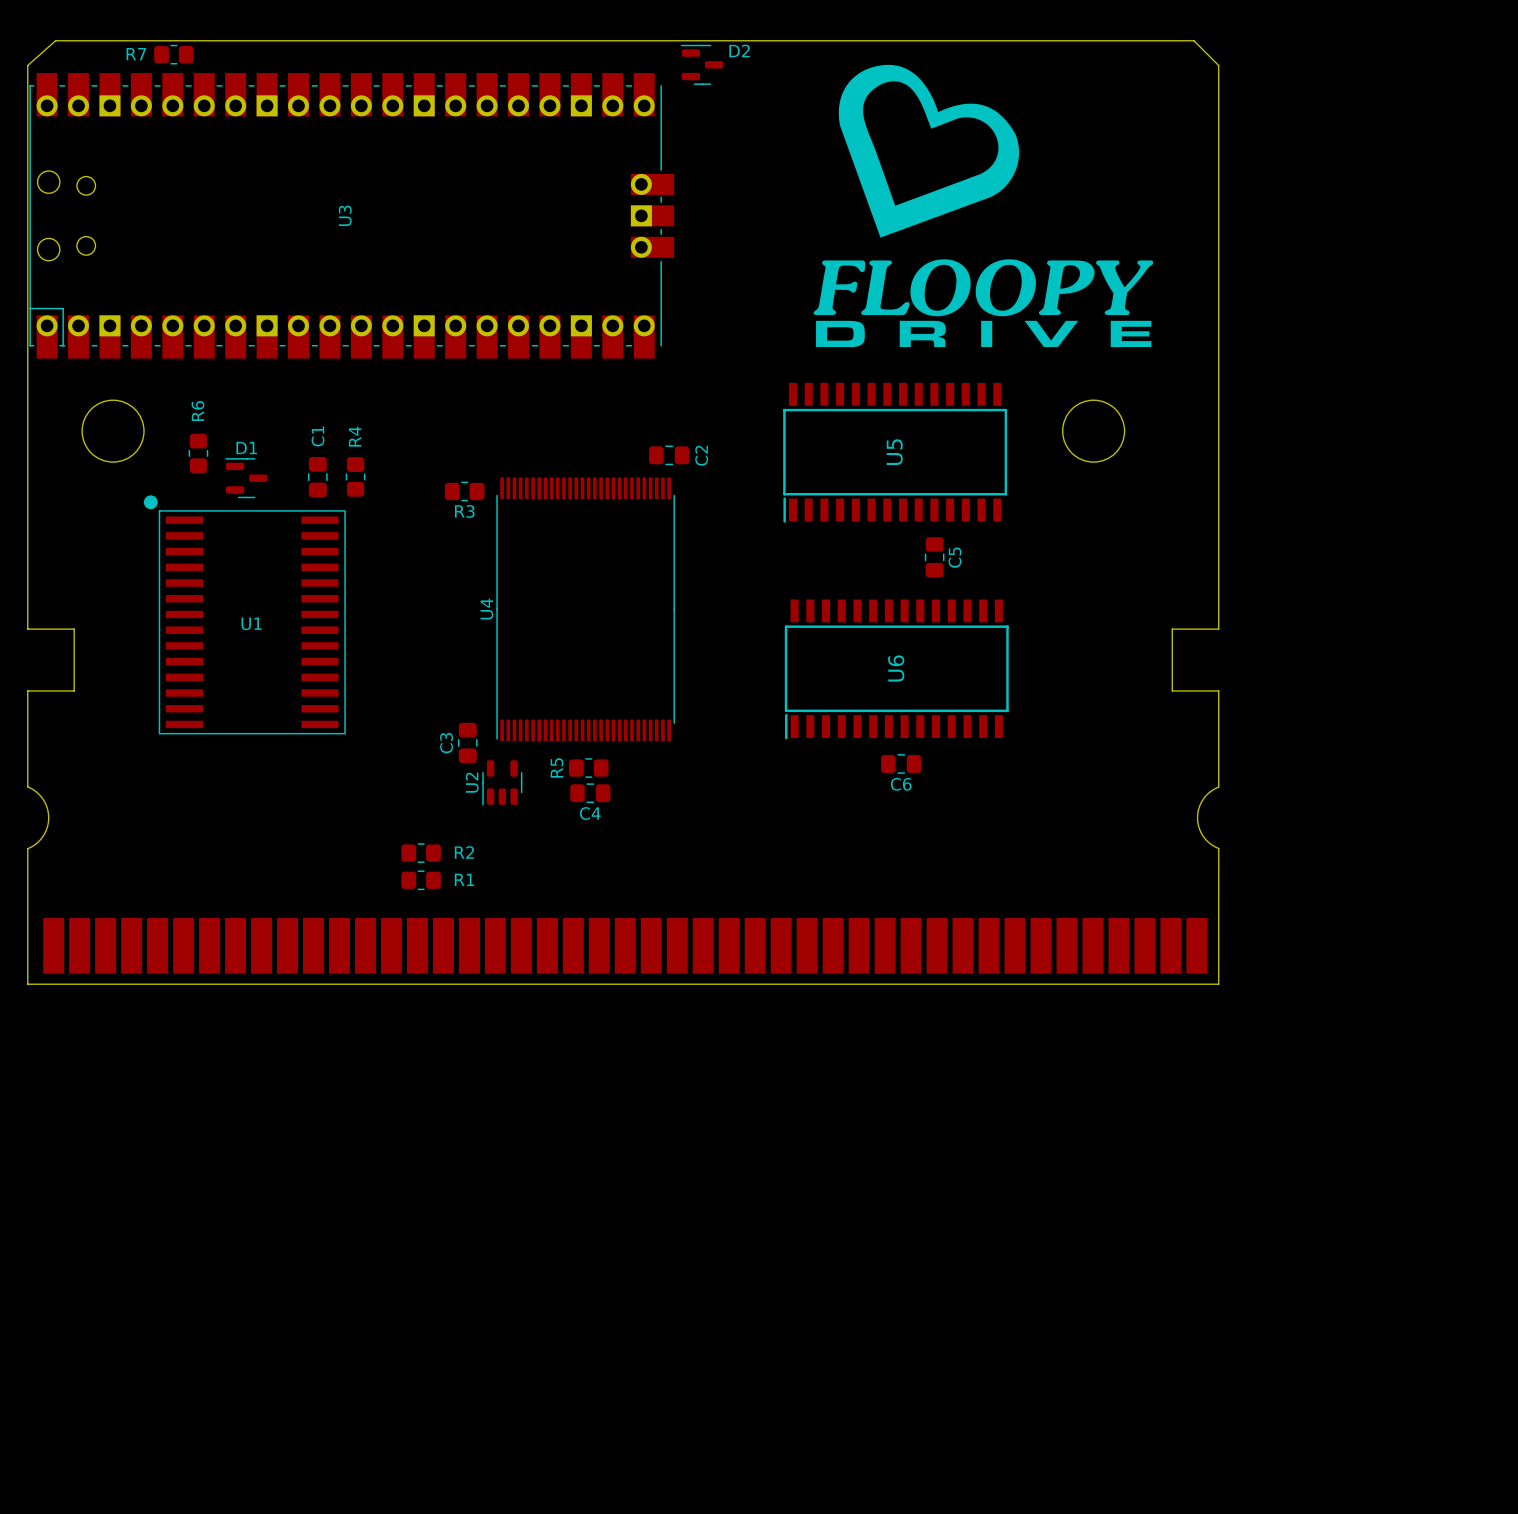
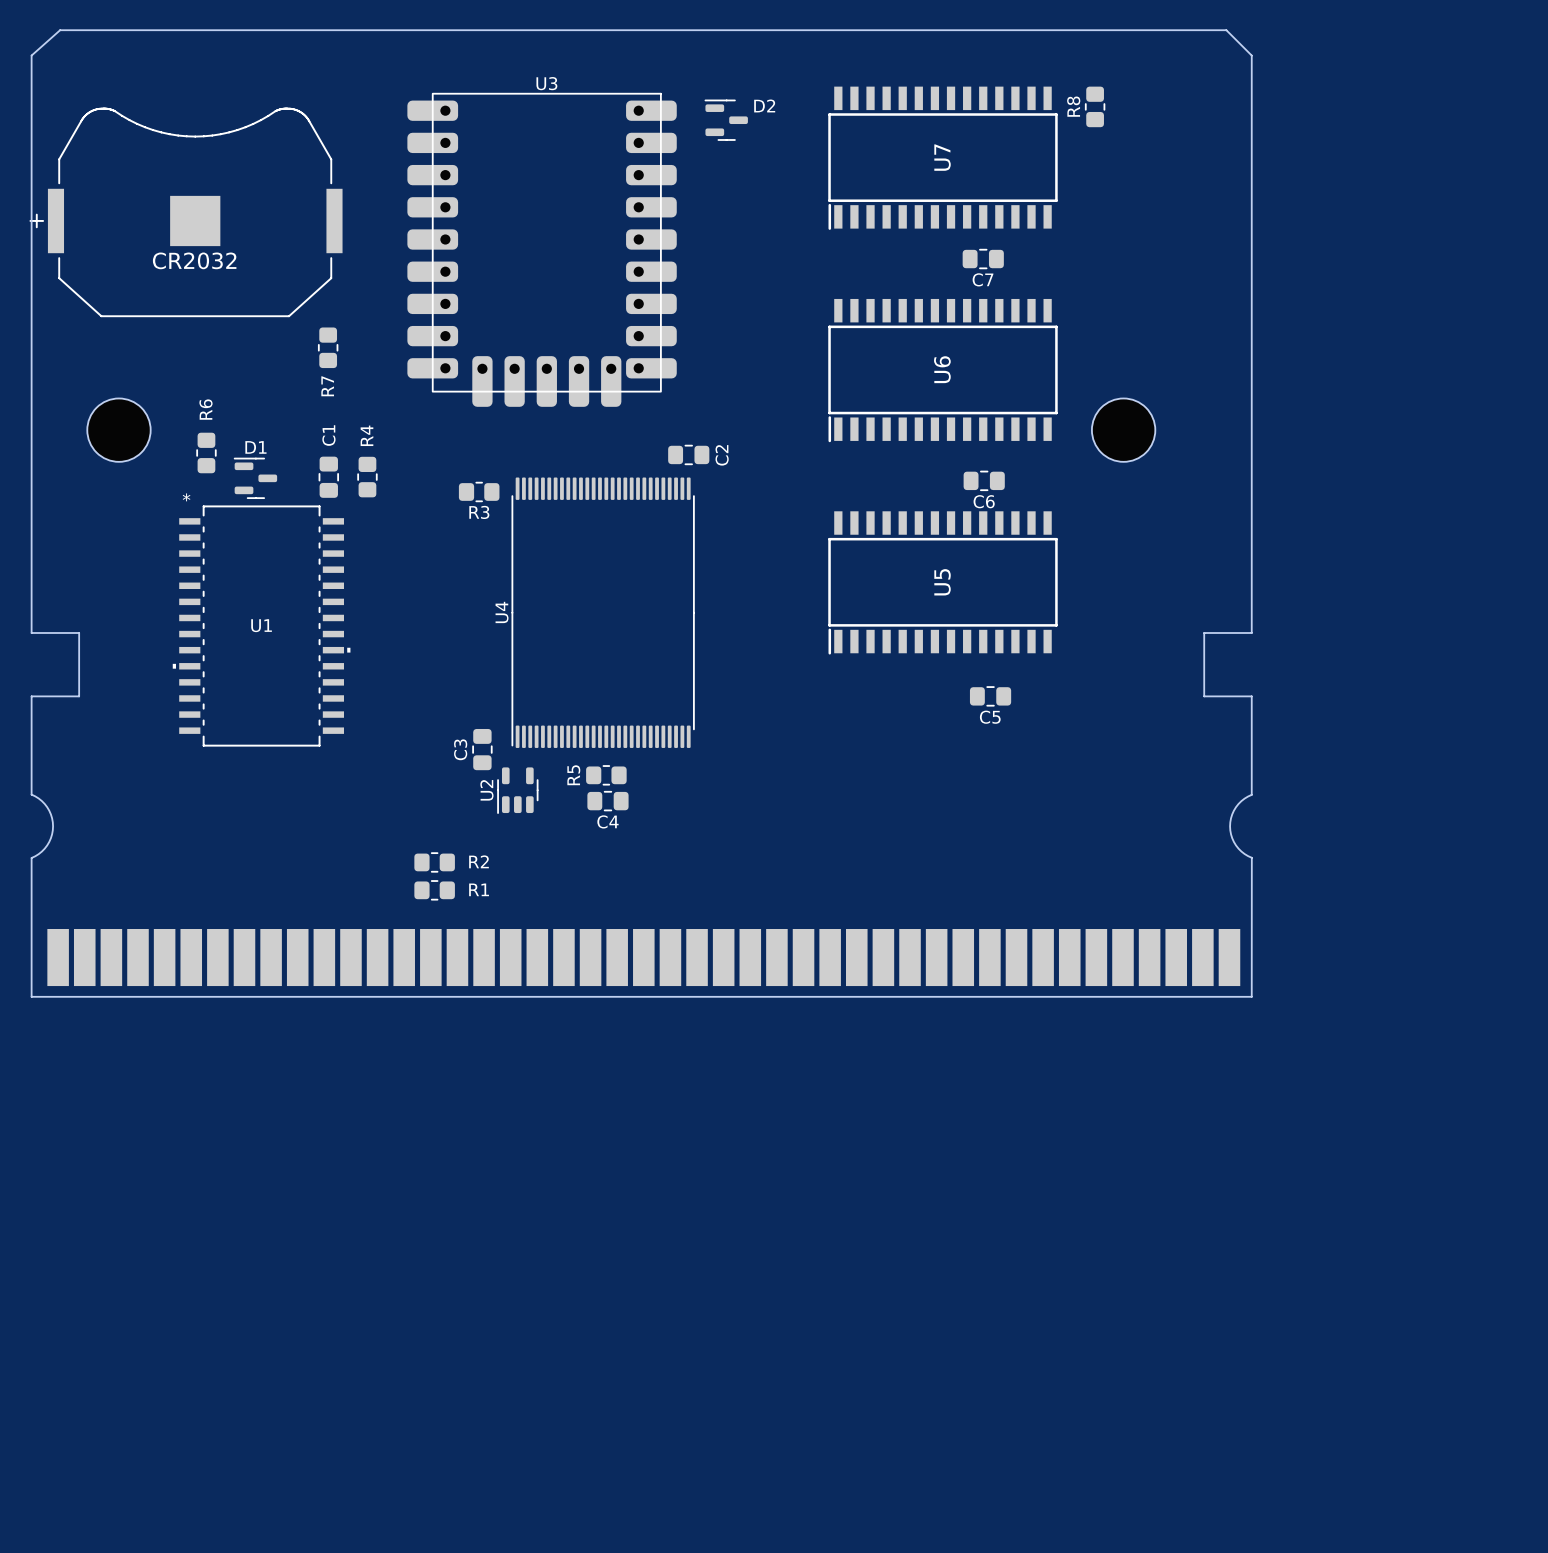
R7 name position: R7 (136, 54) -> R7 (327, 386)
R7 rotation: 0° (173, 54) -> 90° clockwise (328, 347)
R7 position: (173, 54) -> (328, 347)
D2 position: (702, 64) -> (726, 120)
drawing: [838, 64, 1020, 238] -> none
U3 footprint: [29, 73, 675, 359] -> [407, 92, 677, 407]
R8: none -> (1095, 106)
U7: none -> (942, 158)
U3 name position: U3 (345, 215) -> U3 (546, 83)
part: none -> CR2032 (186, 212)
drawing: [813, 259, 1154, 348] -> none
C7: none -> (983, 259)
U5 position: (895, 452) -> (942, 582)
U1 footprint: [143, 495, 346, 735] -> [172, 505, 351, 747]
C5 rotation: 0° (934, 557) -> 90° clockwise (990, 696)
C5 position: (934, 557) -> (990, 696)
U6 position: (896, 669) -> (942, 370)
C6 position: (901, 763) -> (984, 480)

